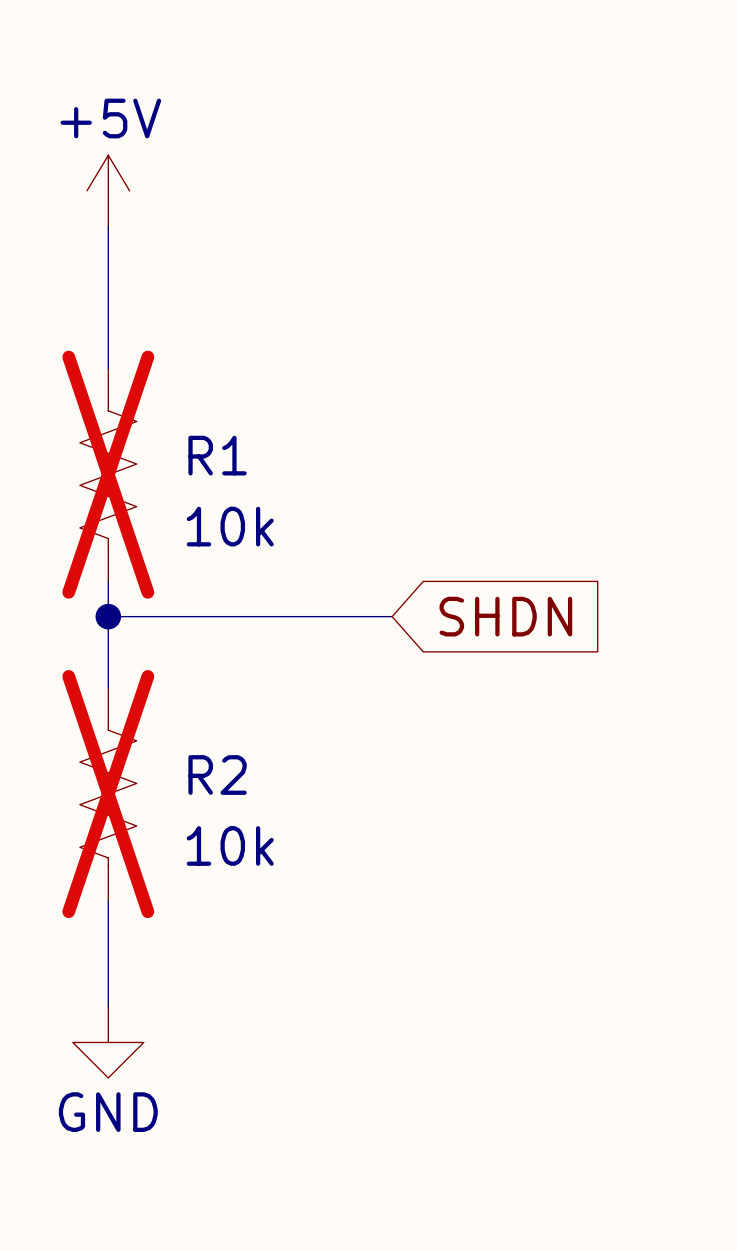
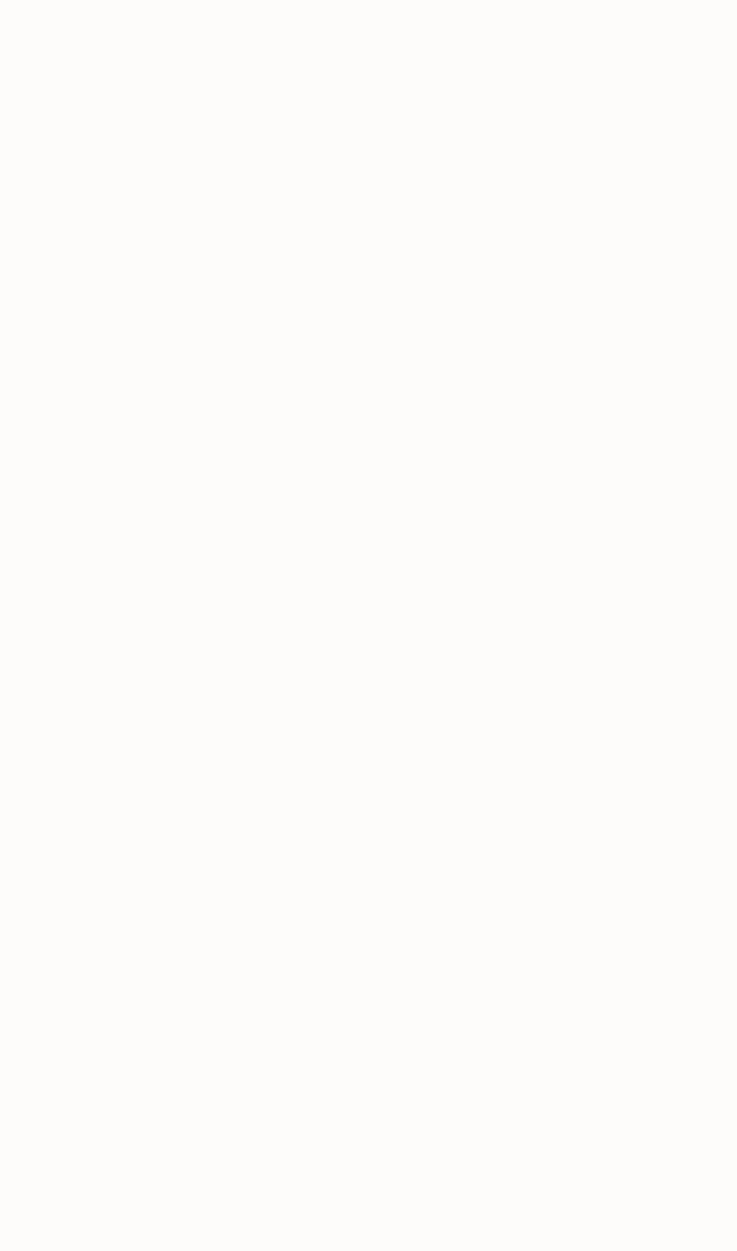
power symbol: +5V (108, 190) -> none
wire: (108, 226) (108, 368) -> none
R1: 10k (108, 474) -> none
wire: (108, 581) (108, 687) -> none
wire: (108, 616) (392, 616) -> none
junction: (108, 616) -> none
global label: SHDN (505, 616) -> none
R2: 10k (108, 794) -> none
wire: (108, 900) (108, 1006) -> none
power symbol: GND (108, 1042) -> none

